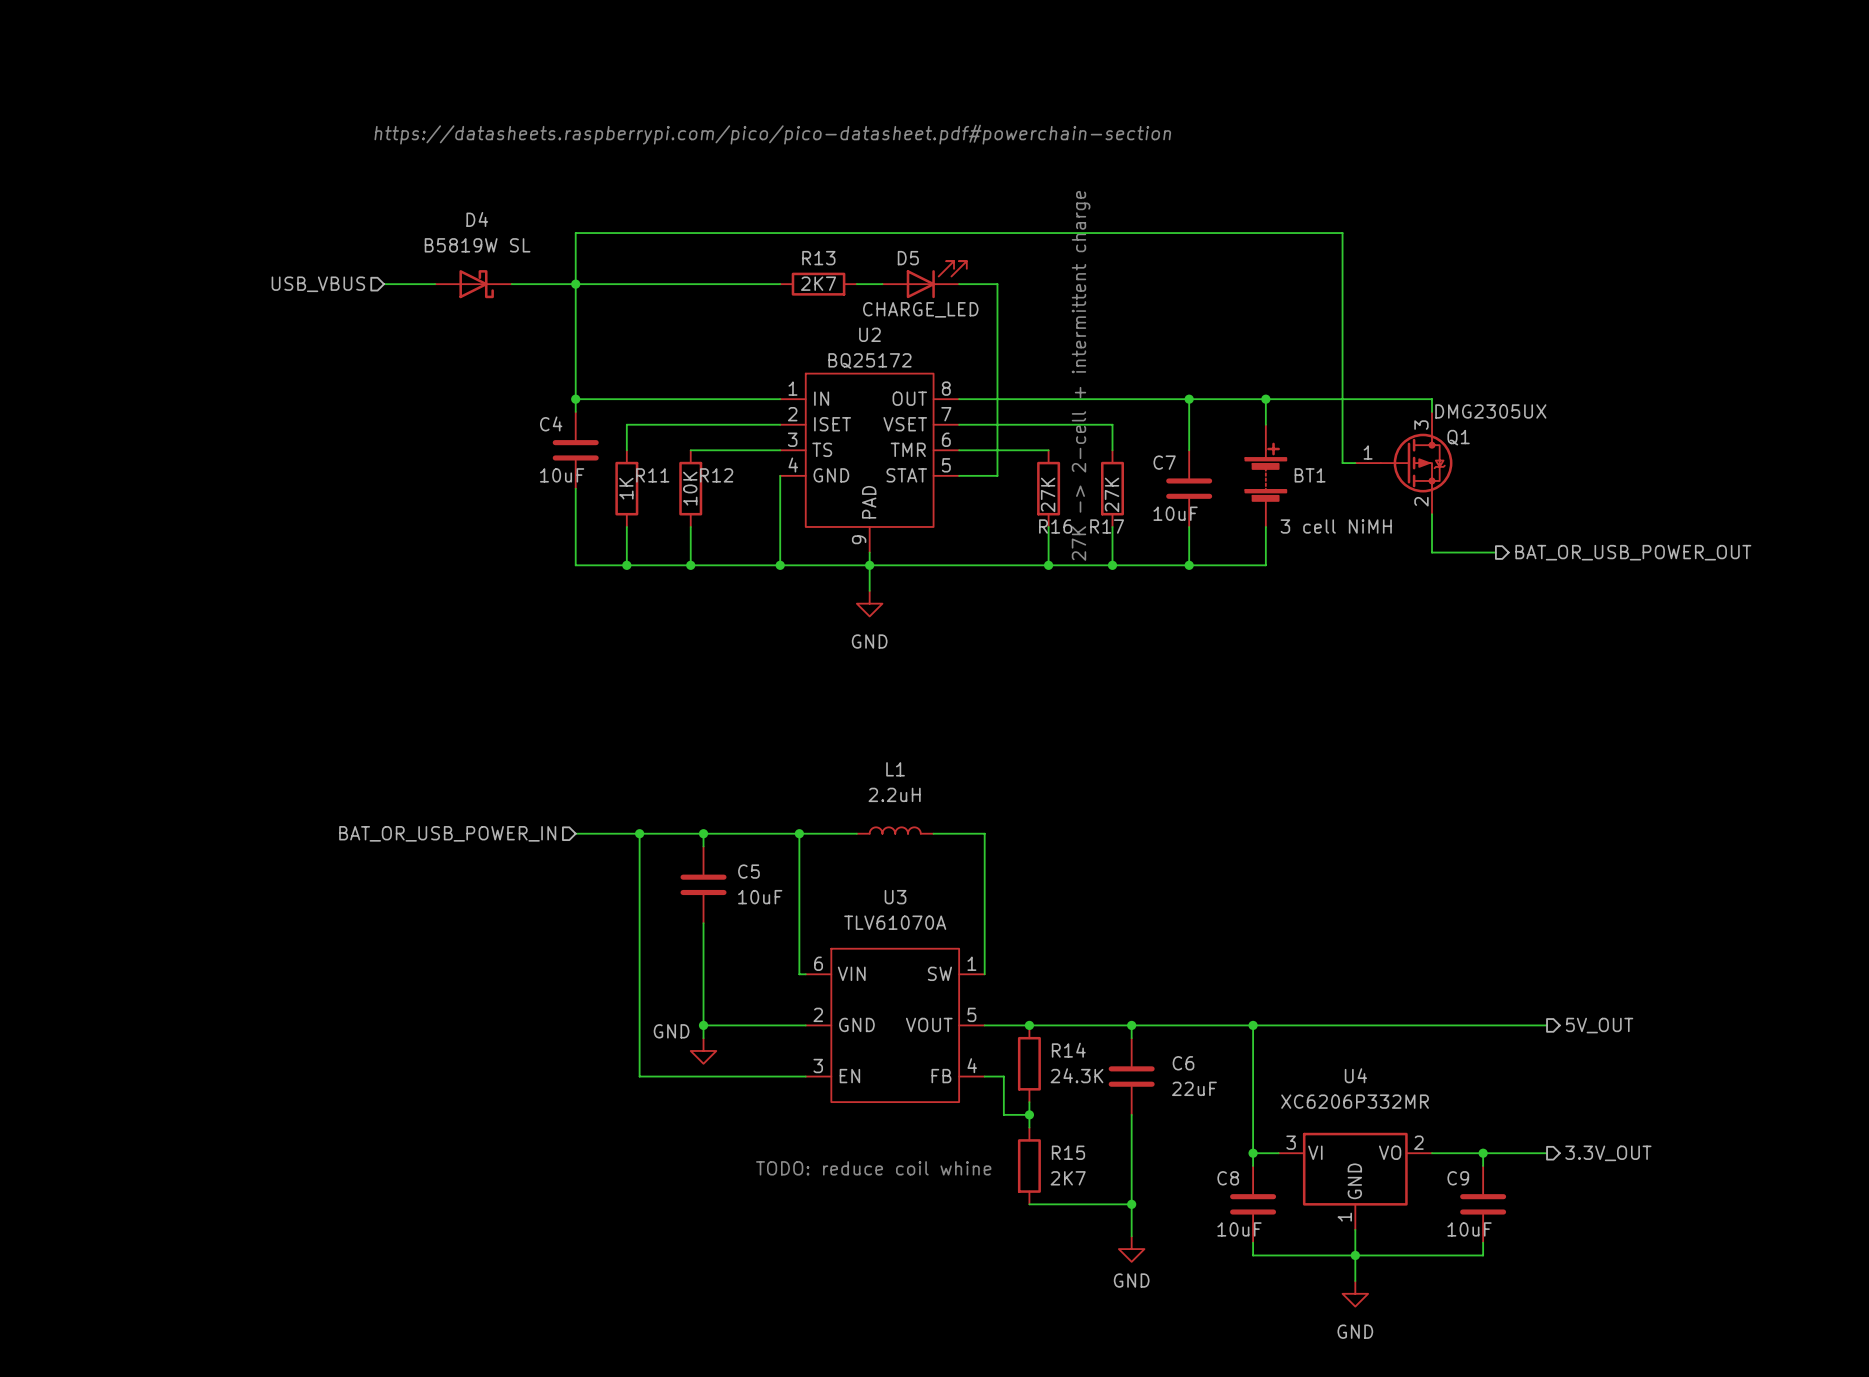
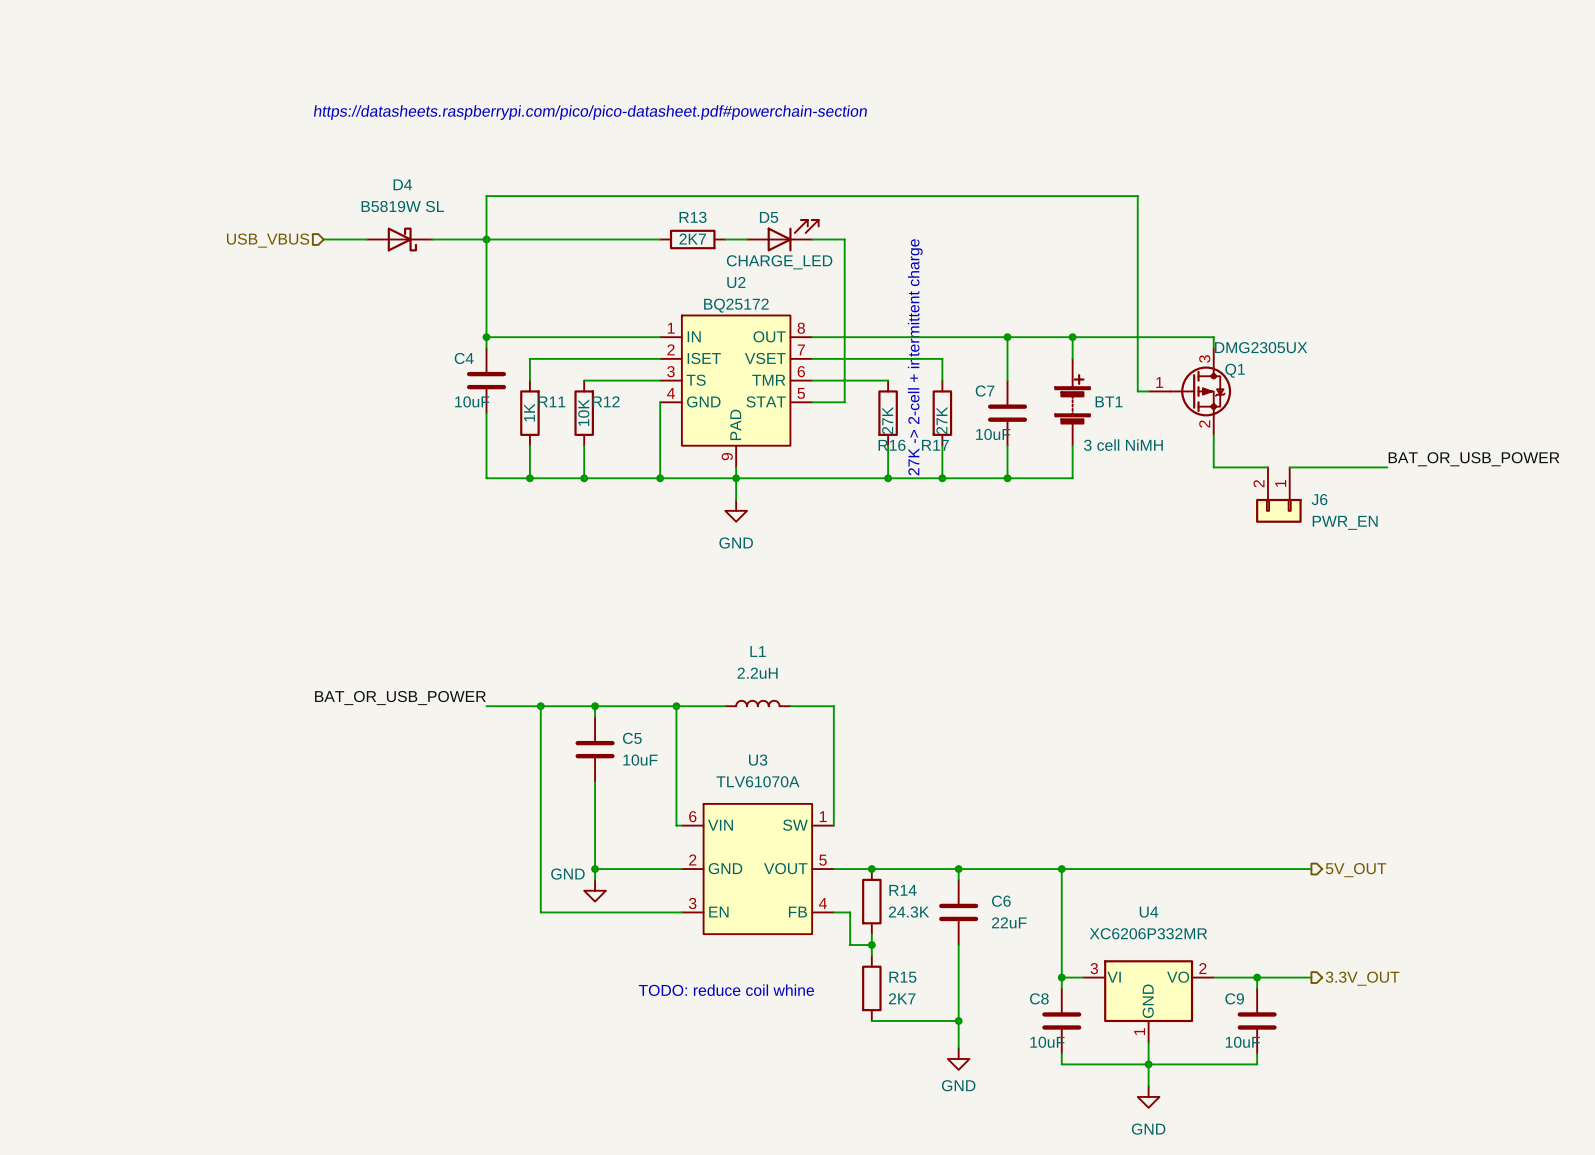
label: none -> BAT_OR_USB_POWER (1474, 459)
wire: none -> (1289, 467) (1387, 467)
hierarchical label: BAT_OR_USB_POWER_OUT (1633, 552) -> none
J6: none -> PWR_EN (1278, 495)
label: none -> BAT_OR_USB_POWER (400, 698)
hierarchical label: BAT_OR_USB_POWER_IN (447, 833) -> none

